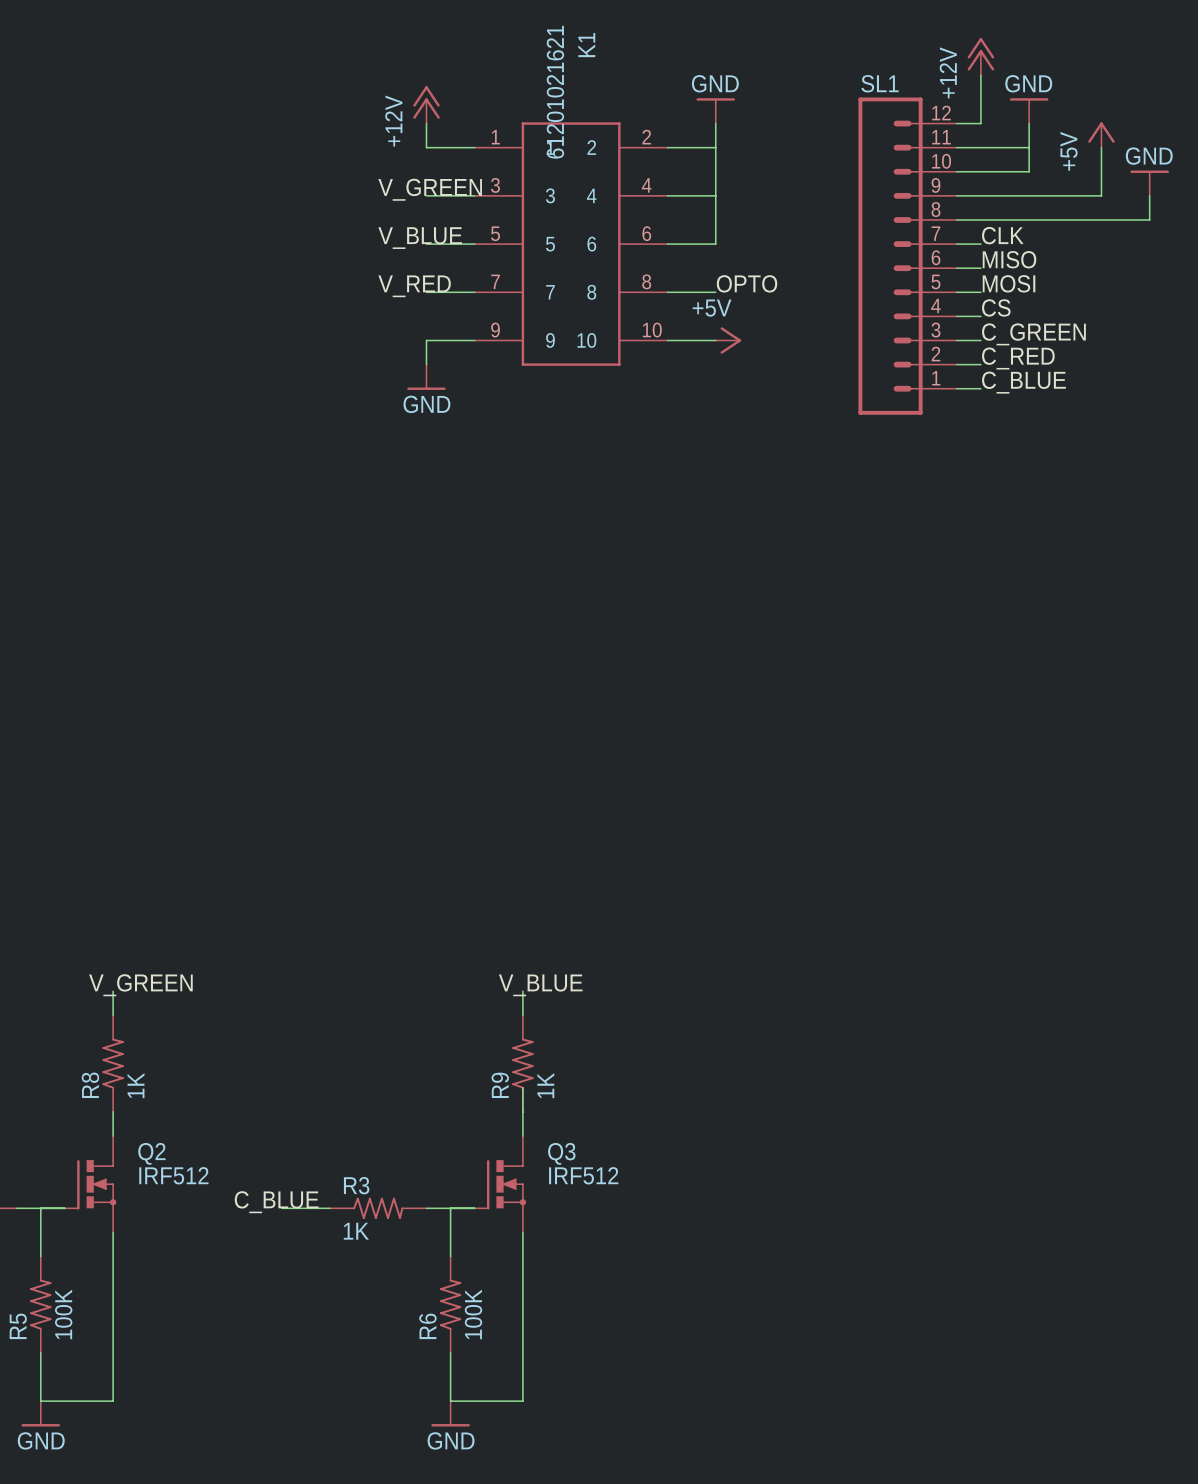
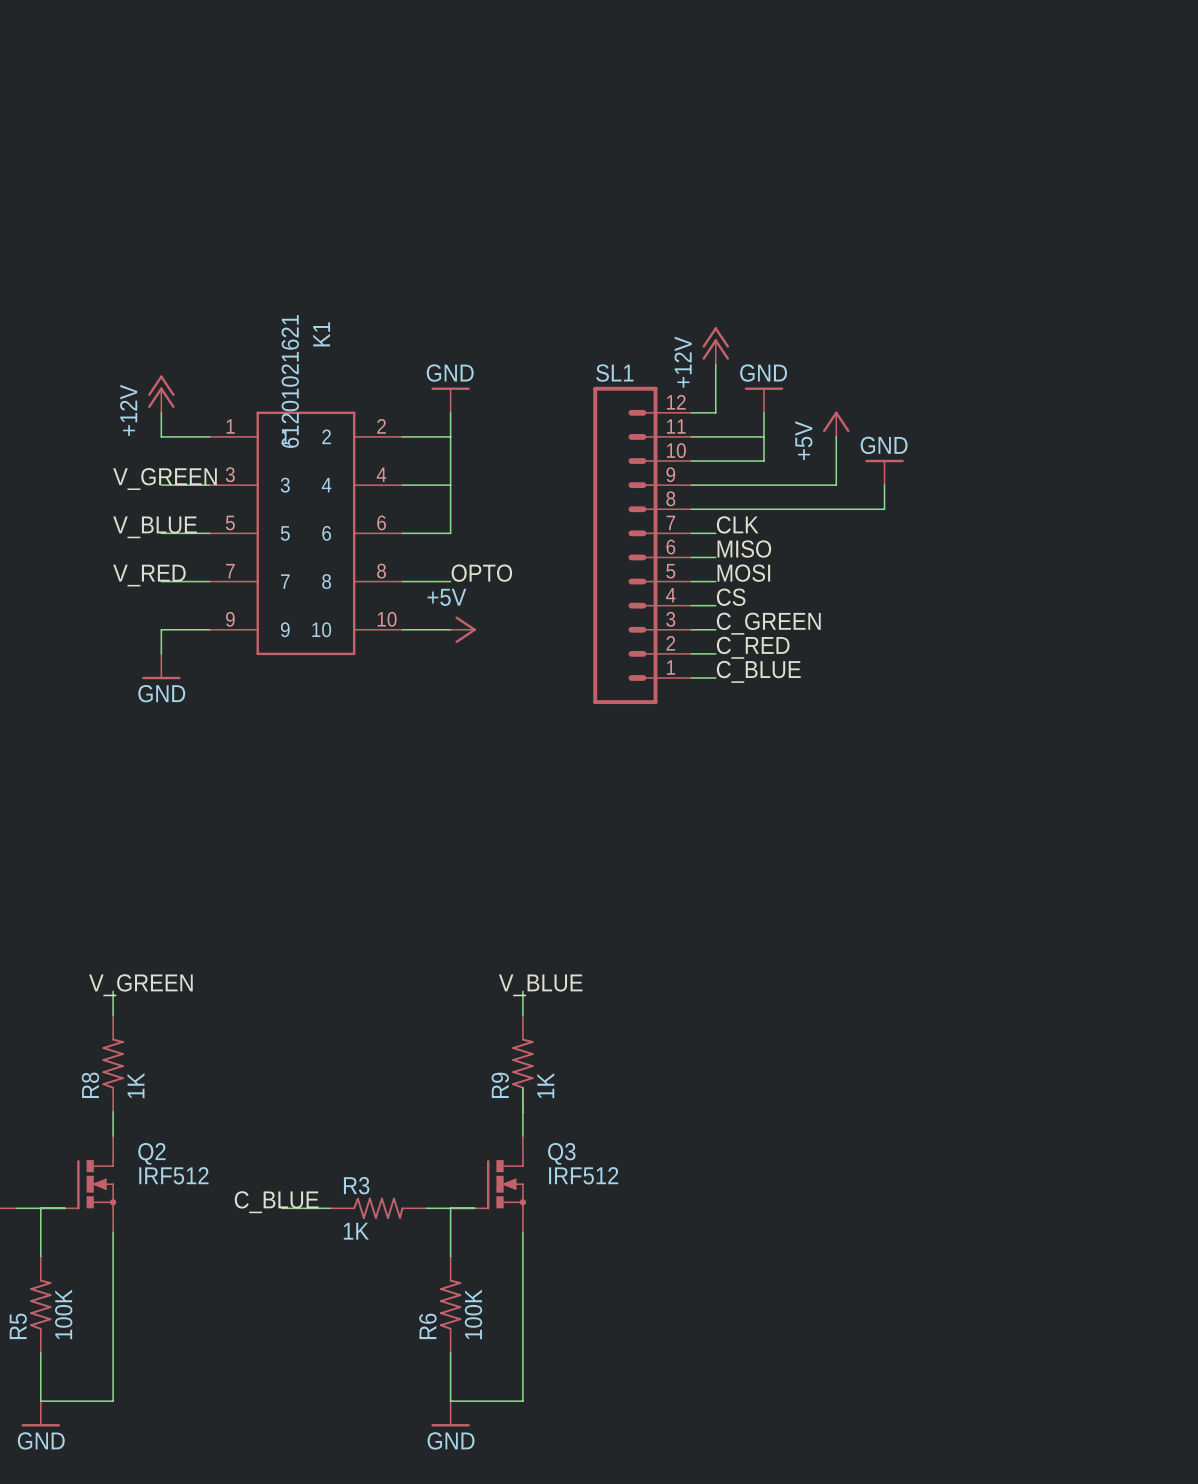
power symbol: +12V (980, 56) -> none
wire: (980, 75) (980, 123) (956, 123) -> none
power symbol: +12V (426, 104) -> none
power symbol: GND (715, 110) -> none
power symbol: GND (1029, 110) -> none
wire: (426, 123) (426, 147) (474, 147) -> none
wire: (715, 123) (715, 244) (667, 244) -> none
wire: (1029, 123) (1029, 171) (956, 171) -> none
power symbol: +5V (1101, 135) -> none
wire: (667, 147) (715, 147) -> none
wire: (956, 147) (1029, 147) -> none
wire: (1101, 147) (1101, 195) (956, 195) -> none
power symbol: GND (1149, 183) -> none
label: V_GREEN (430, 189) -> none
wire: (426, 195) (474, 195) -> none
wire: (667, 195) (715, 195) -> none
wire: (1149, 195) (1149, 219) (956, 219) -> none
label: CLK (1002, 235) -> none
label: V_BLUE (420, 238) -> none
wire: (426, 244) (474, 244) -> (402, 436) (450, 436)
K1 position: (571, 244) -> (305, 533)
wire: (956, 244) (980, 244) -> none
SL1 position: (907, 256) -> (642, 545)
label: MISO (1009, 259) -> none
wire: (956, 268) (980, 268) -> none
label: OPTO (747, 283) -> none
label: MOSI (1009, 283) -> none
label: V_RED (414, 286) -> none
wire: (426, 292) (474, 292) -> (402, 485) (450, 485)
wire: (667, 292) (715, 292) -> none
wire: (956, 292) (980, 292) -> none
label: CS (996, 307) -> none
wire: (956, 316) (980, 316) -> none
label: C_GREEN (1033, 334) -> none
wire: (474, 340) (426, 340) (426, 364) -> none
wire: (667, 340) (715, 340) -> none
power symbol position: +5V (728, 340) -> +5V (836, 424)
power symbol rotation: 0° (730, 340) -> 90° counterclockwise (836, 421)
wire: (956, 340) (980, 340) -> none
power symbol: none -> +12V (715, 345)
label: C_RED (1018, 358) -> none
wire: none -> (715, 364) (715, 412) (691, 412)
wire: (956, 364) (980, 364) -> none
power symbol position: GND (426, 377) -> GND (450, 400)
label: C_BLUE (1023, 382) -> none
power symbol rotation: 0° (426, 388) -> 180° (450, 388)
wire: (956, 388) (980, 388) -> none
power symbol: none -> +12V (161, 394)
power symbol: none -> GND (763, 400)
wire: none -> (161, 412) (161, 436) (209, 436)
wire: none -> (450, 412) (450, 533) (402, 533)
wire: none -> (763, 412) (763, 461) (691, 461)
wire: none -> (691, 436) (763, 436)
wire: none -> (836, 436) (836, 485) (691, 485)
power symbol: none -> GND (884, 472)
label: none -> V_GREEN (165, 479)
wire: none -> (161, 485) (209, 485)
wire: none -> (884, 485) (884, 509) (691, 509)
label: none -> CLK (737, 524)
label: none -> V_BLUE (155, 527)
wire: none -> (161, 533) (209, 533)
wire: none -> (691, 533) (715, 533)
label: none -> MISO (744, 549)
wire: none -> (691, 557) (715, 557)
label: none -> OPTO (481, 573)
label: none -> MOSI (743, 573)
label: none -> V_RED (149, 575)
wire: none -> (161, 581) (209, 581)
wire: none -> (402, 581) (450, 581)
wire: none -> (691, 581) (715, 581)
label: none -> CS (731, 597)
wire: none -> (691, 605) (715, 605)
label: none -> C_GREEN (768, 623)
wire: none -> (209, 629) (161, 629) (161, 653)
wire: none -> (402, 629) (450, 629)
power symbol: none -> +5V (463, 629)
wire: none -> (691, 629) (715, 629)
label: none -> C_RED (753, 647)
wire: none -> (691, 653) (715, 653)
power symbol: none -> GND (161, 666)
label: none -> C_BLUE (758, 671)
wire: none -> (691, 677) (715, 677)

